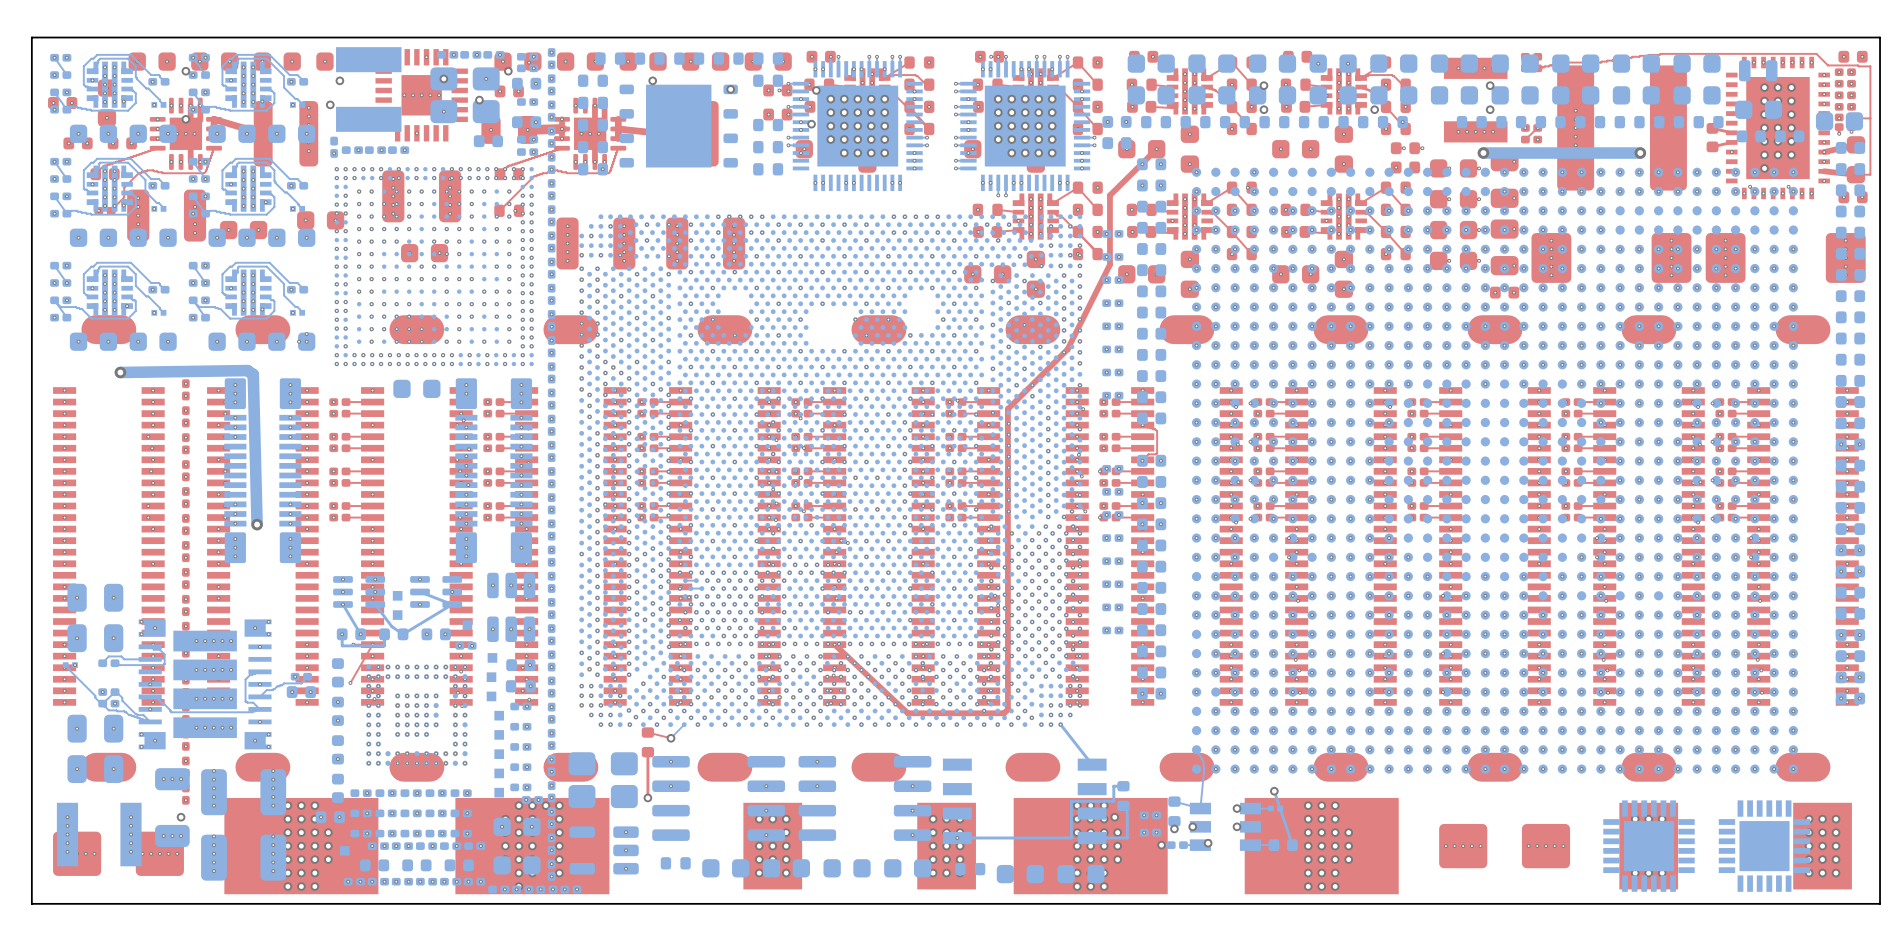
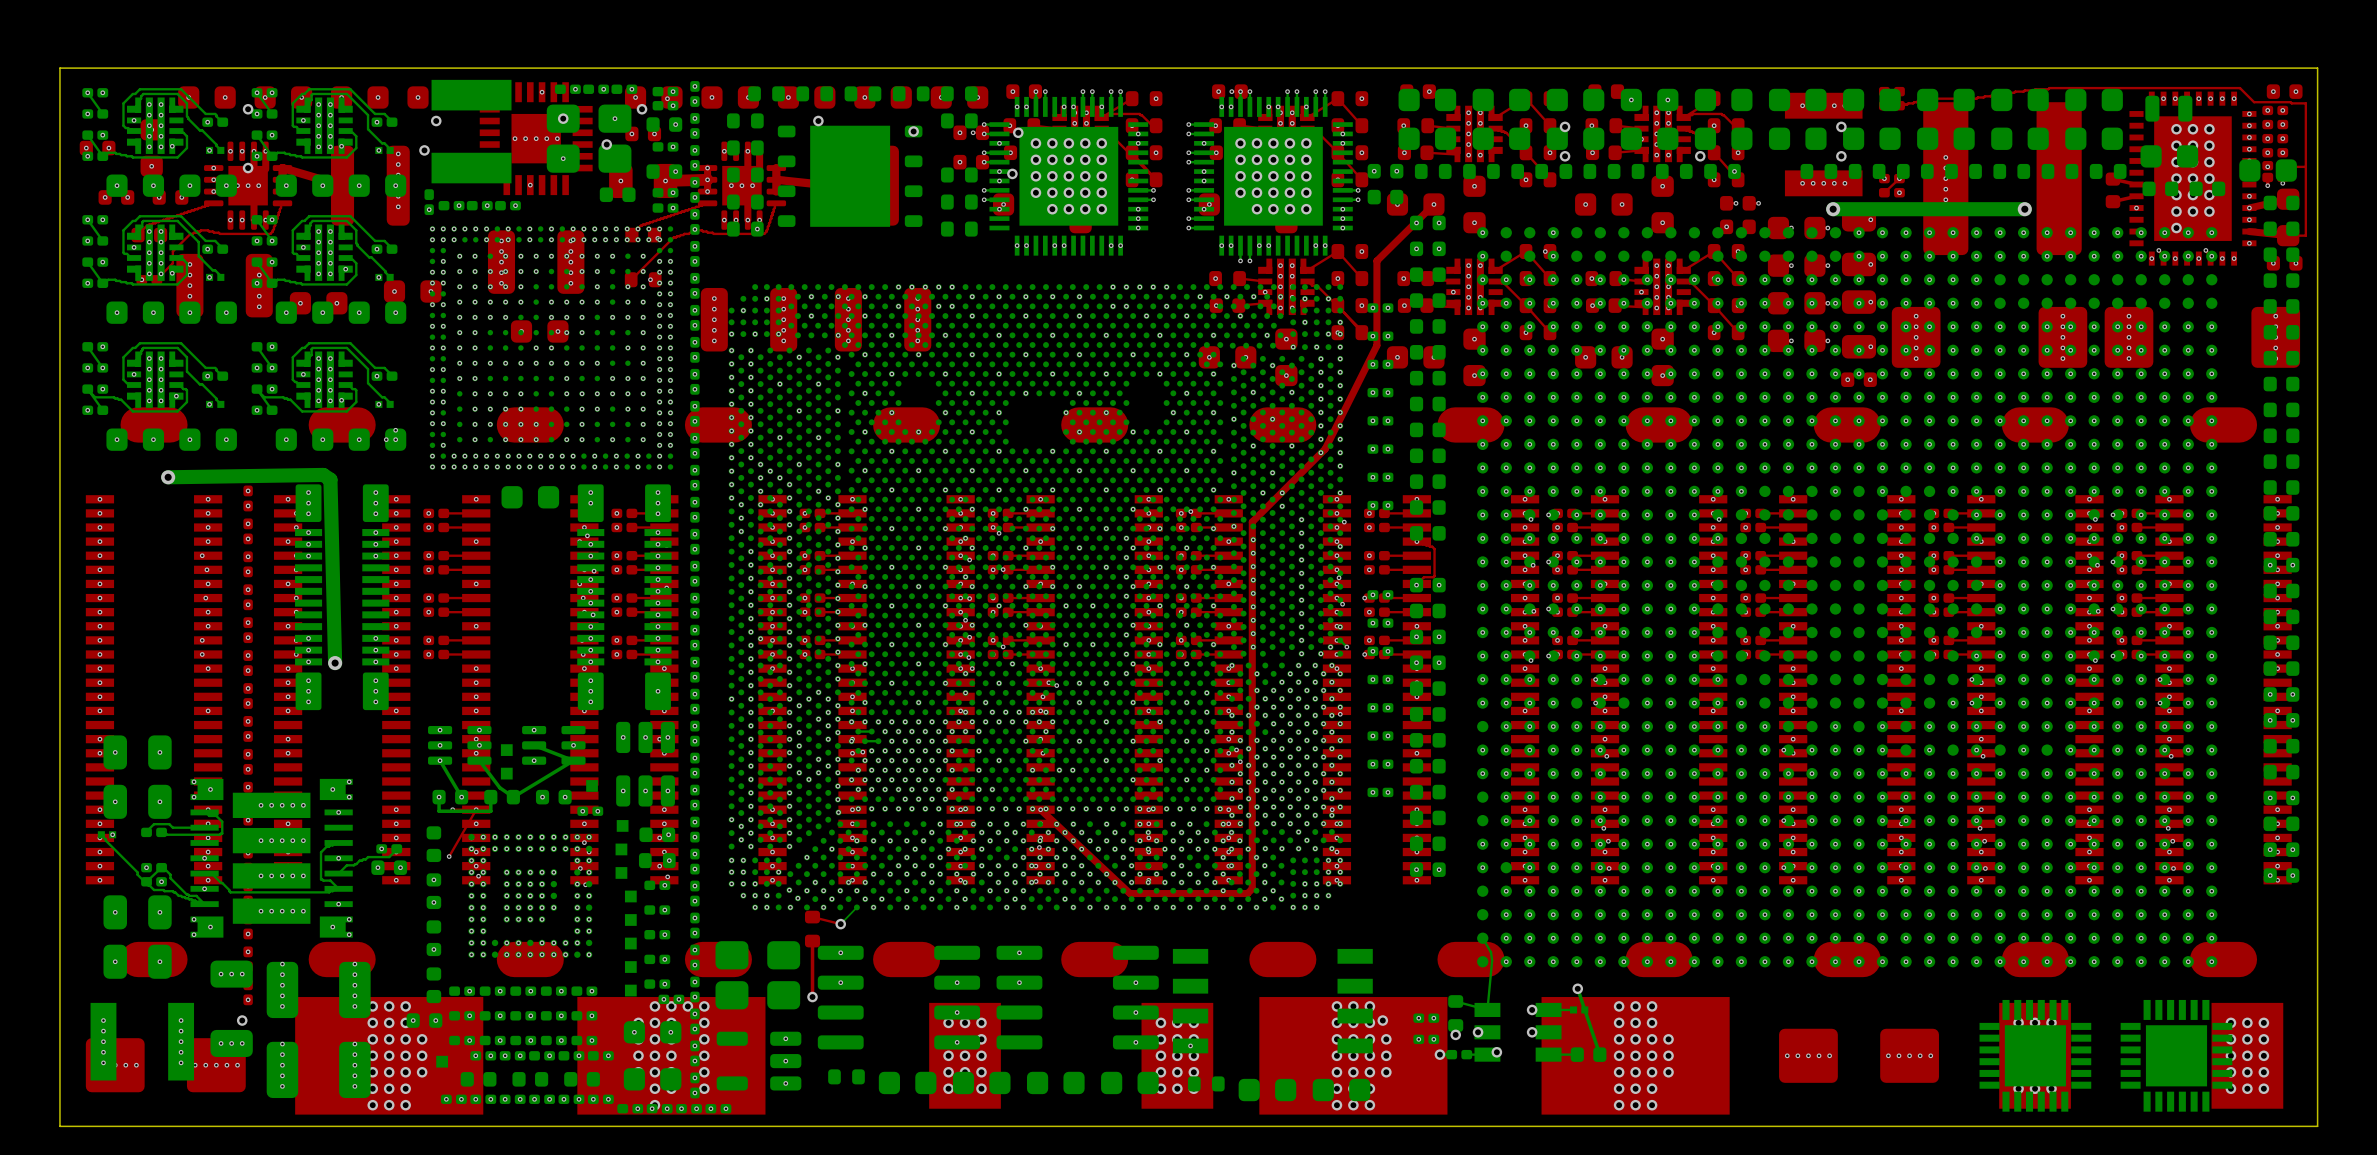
bottom track: (1060, 724) (1092, 764) -> none
bottom track: (1123, 786) (1113, 786) (1113, 801) (1071, 801) (1071, 838) (957, 838) -> none
part: (1123, 796) -> none
bottom track: (1123, 805) (1127, 805) (1127, 838) (1092, 838) -> none

